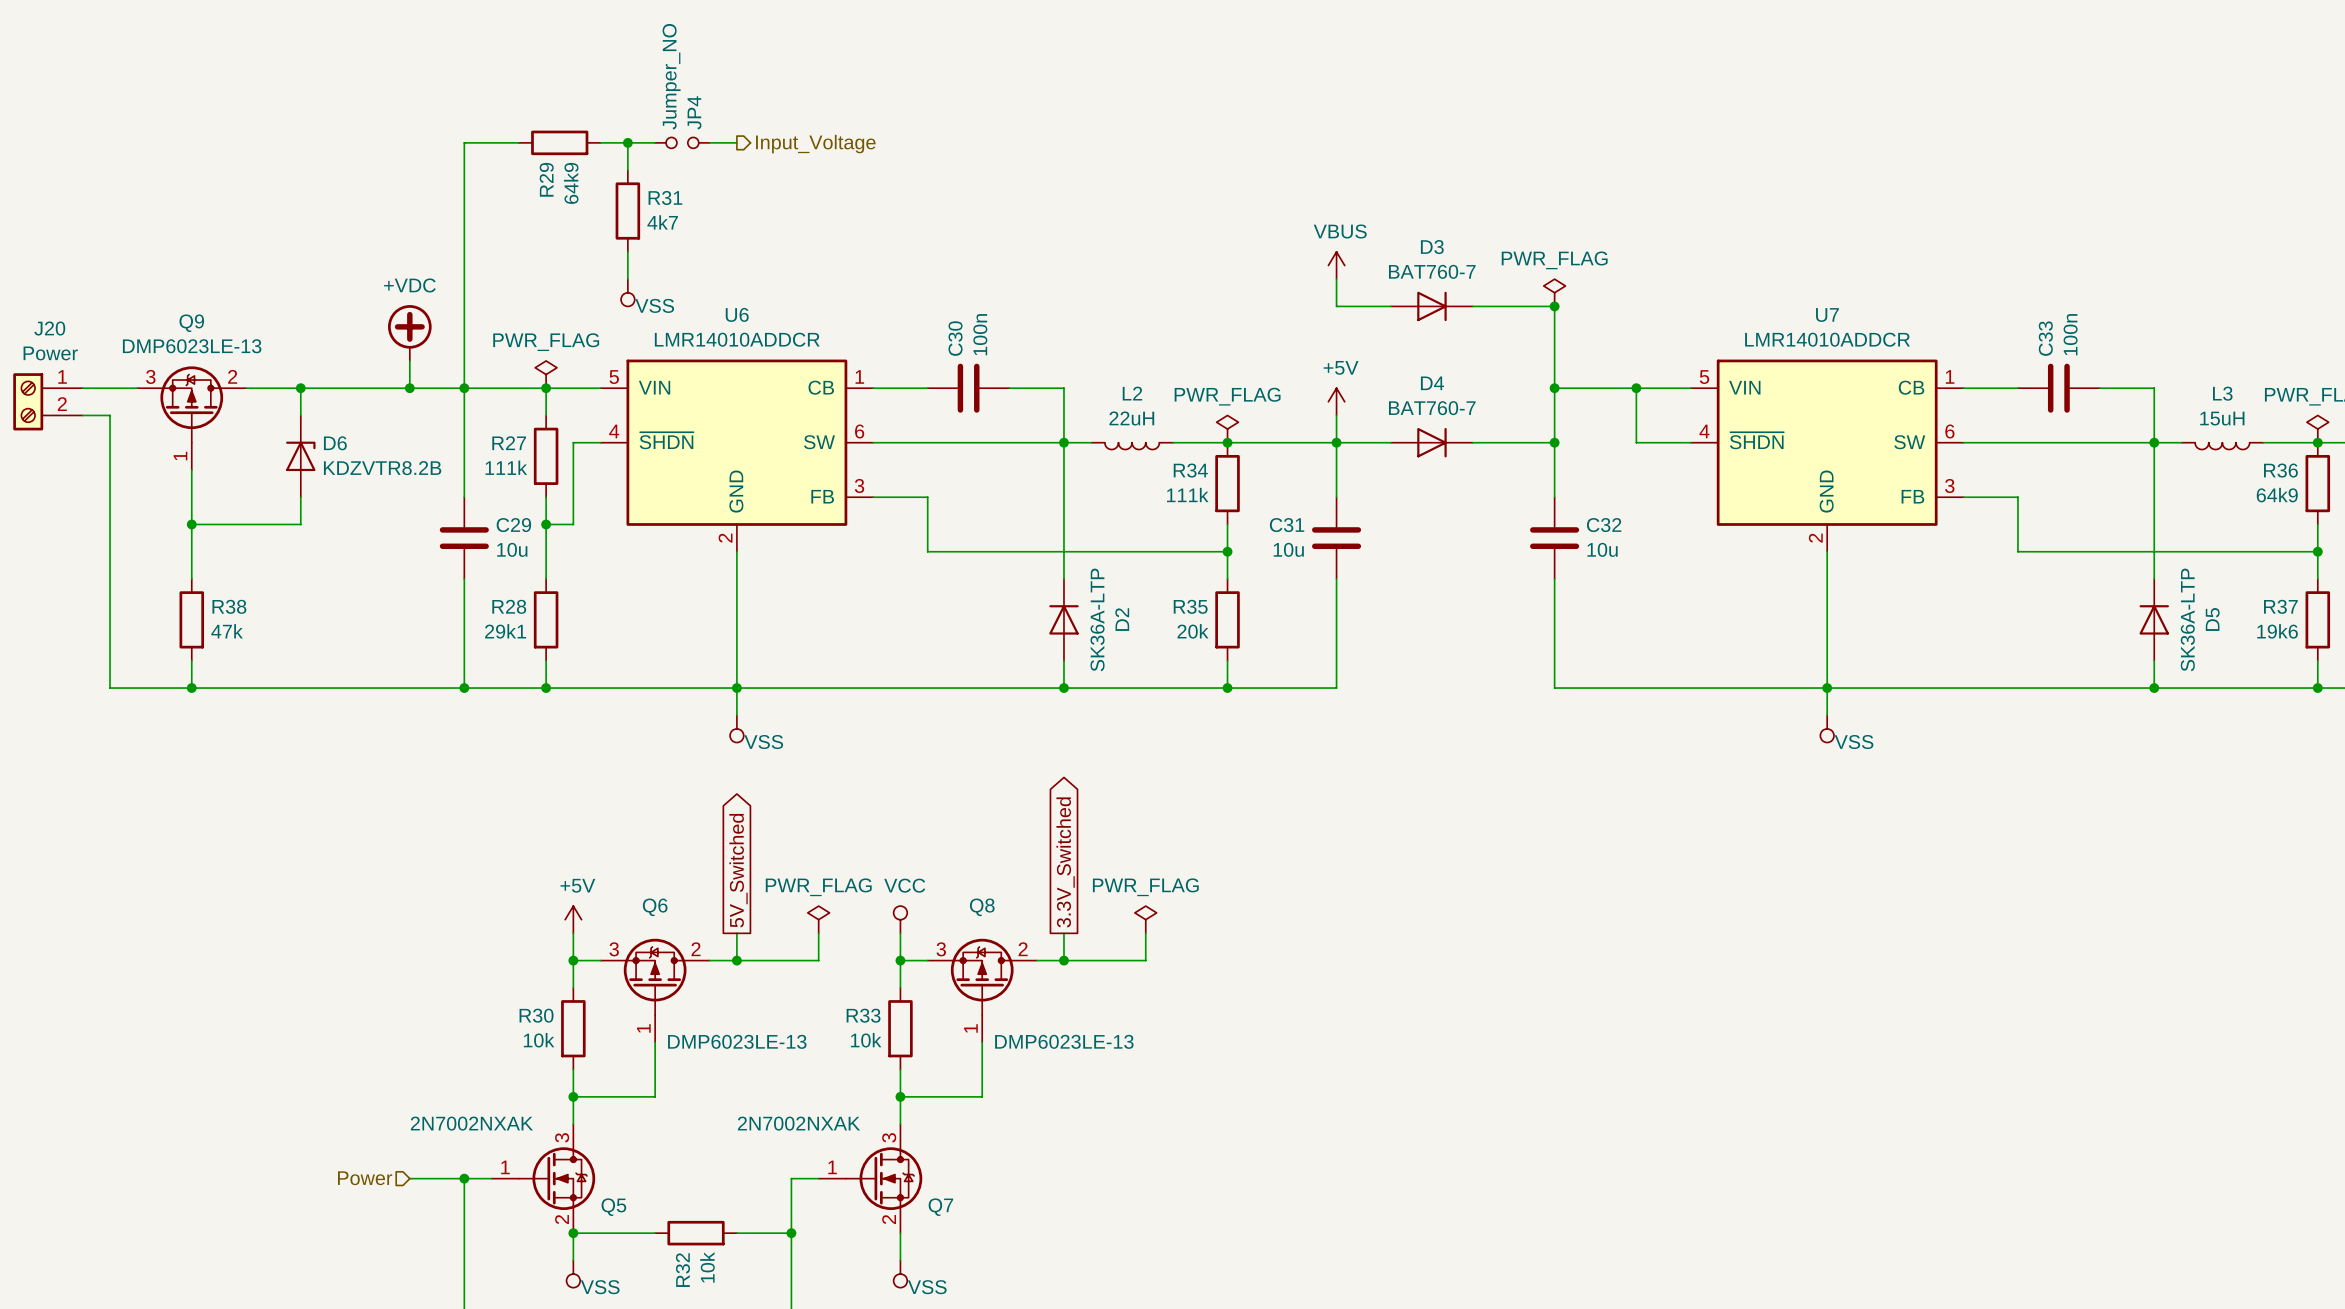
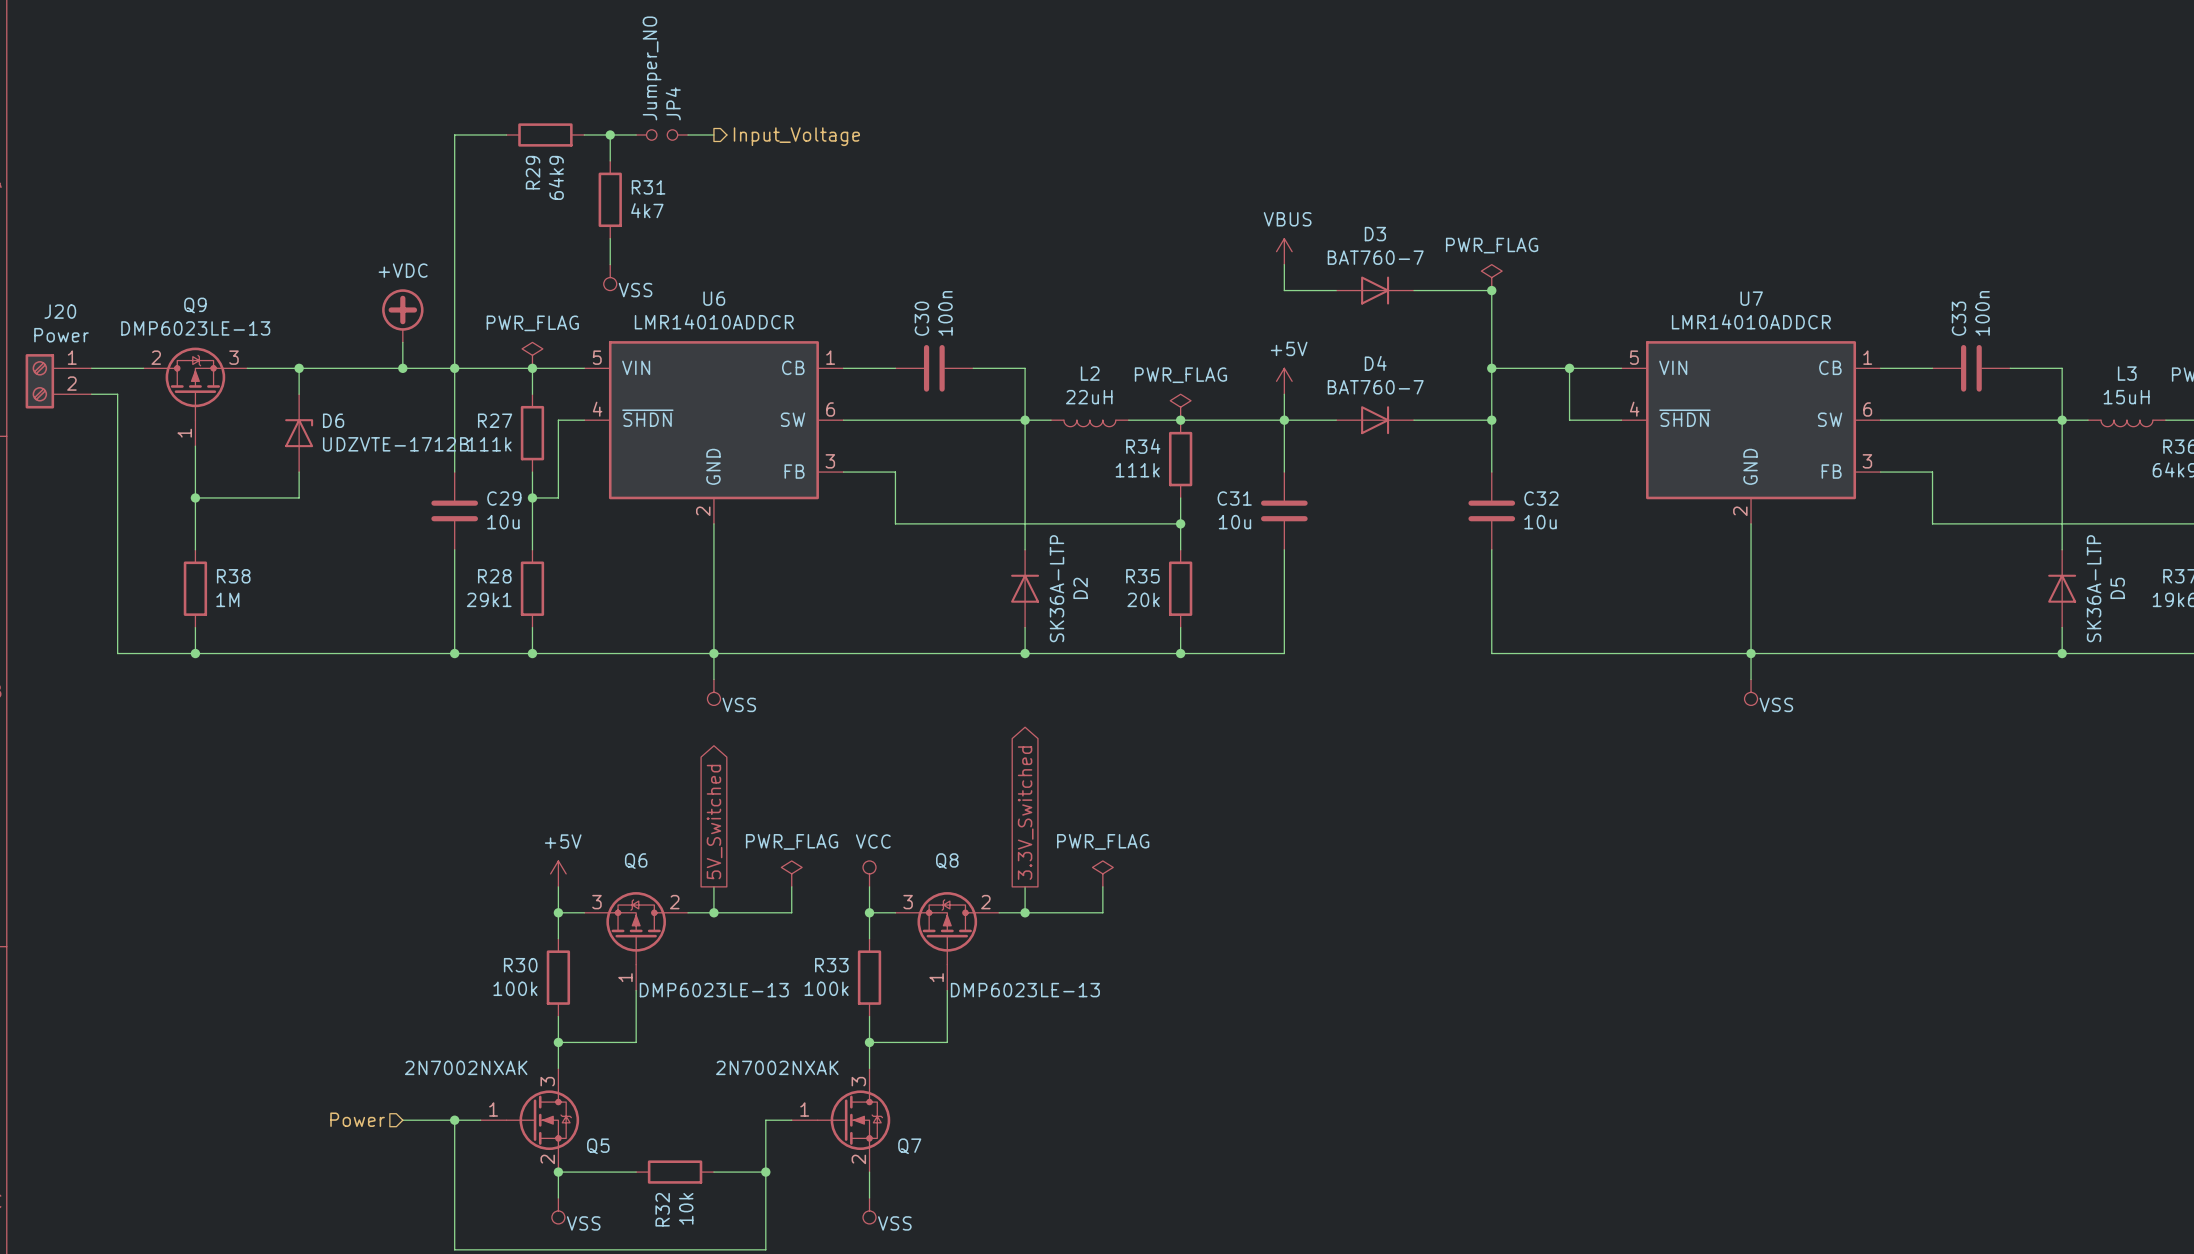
Q9 flip: as is (191, 404) -> left-right (195, 383)
D6 value: KDZVTR8.2B (382, 468) -> UDZVTE-1712B (395, 444)
R38 value: 47k (227, 631) -> 1M (227, 599)
R30 value: 10k (539, 1040) -> 100k (515, 988)
R33 value: 10k (866, 1040) -> 100k (826, 988)

